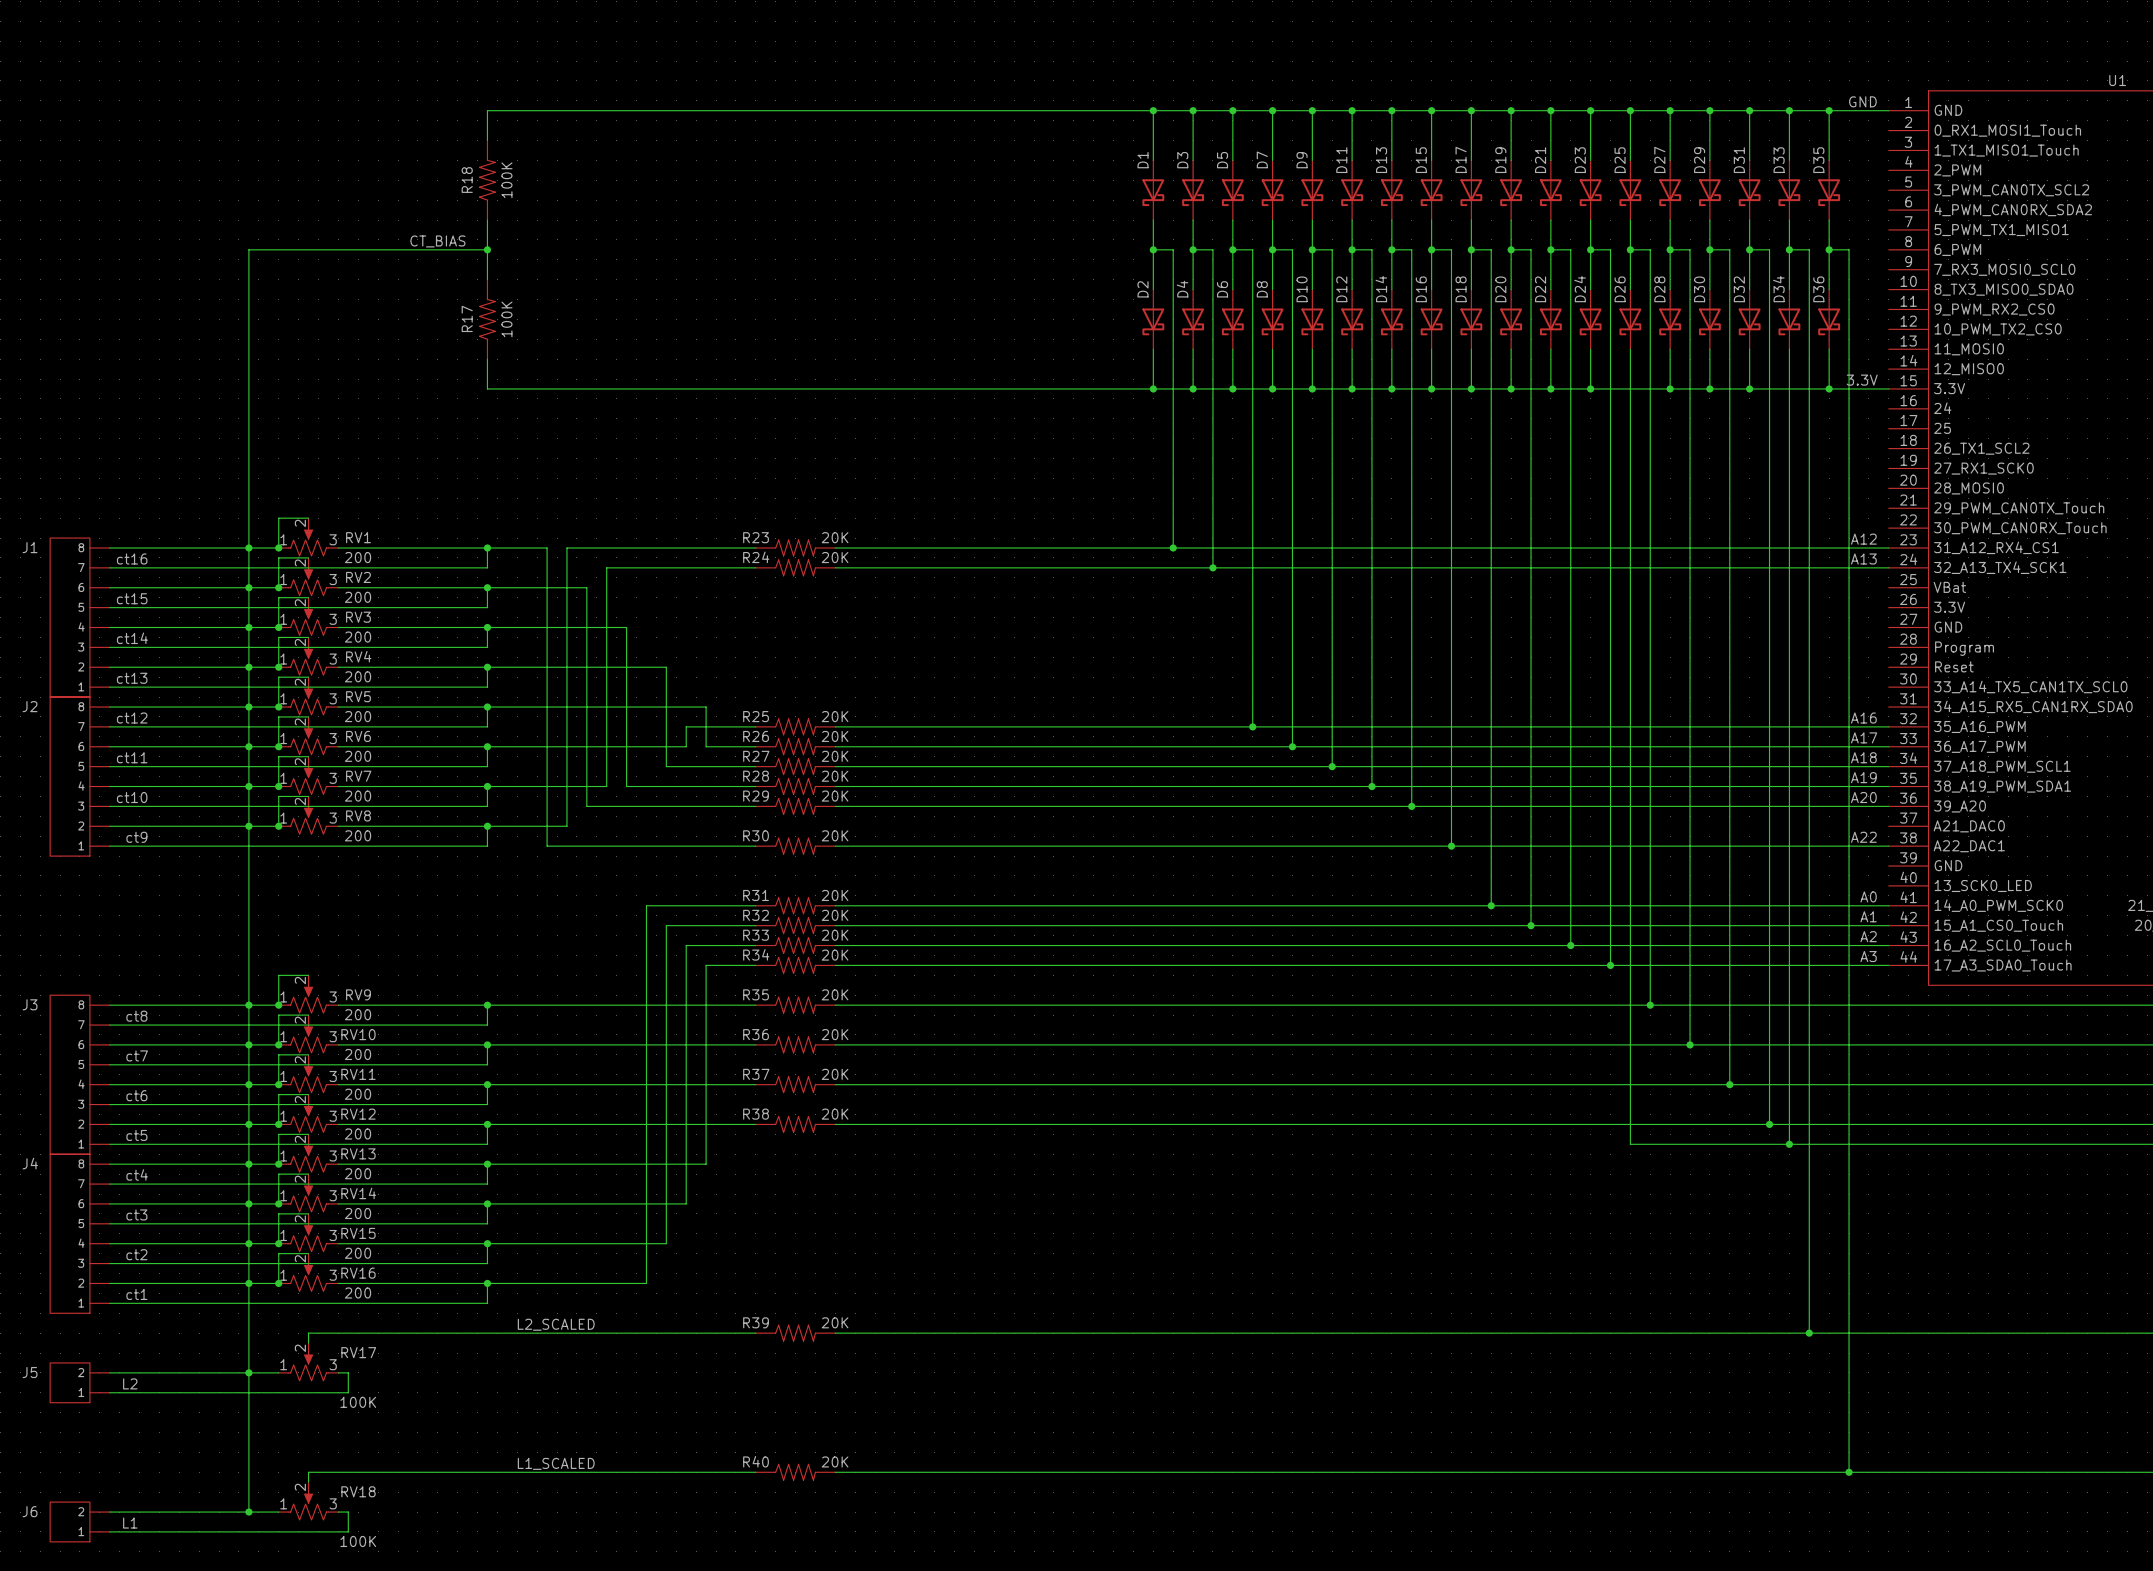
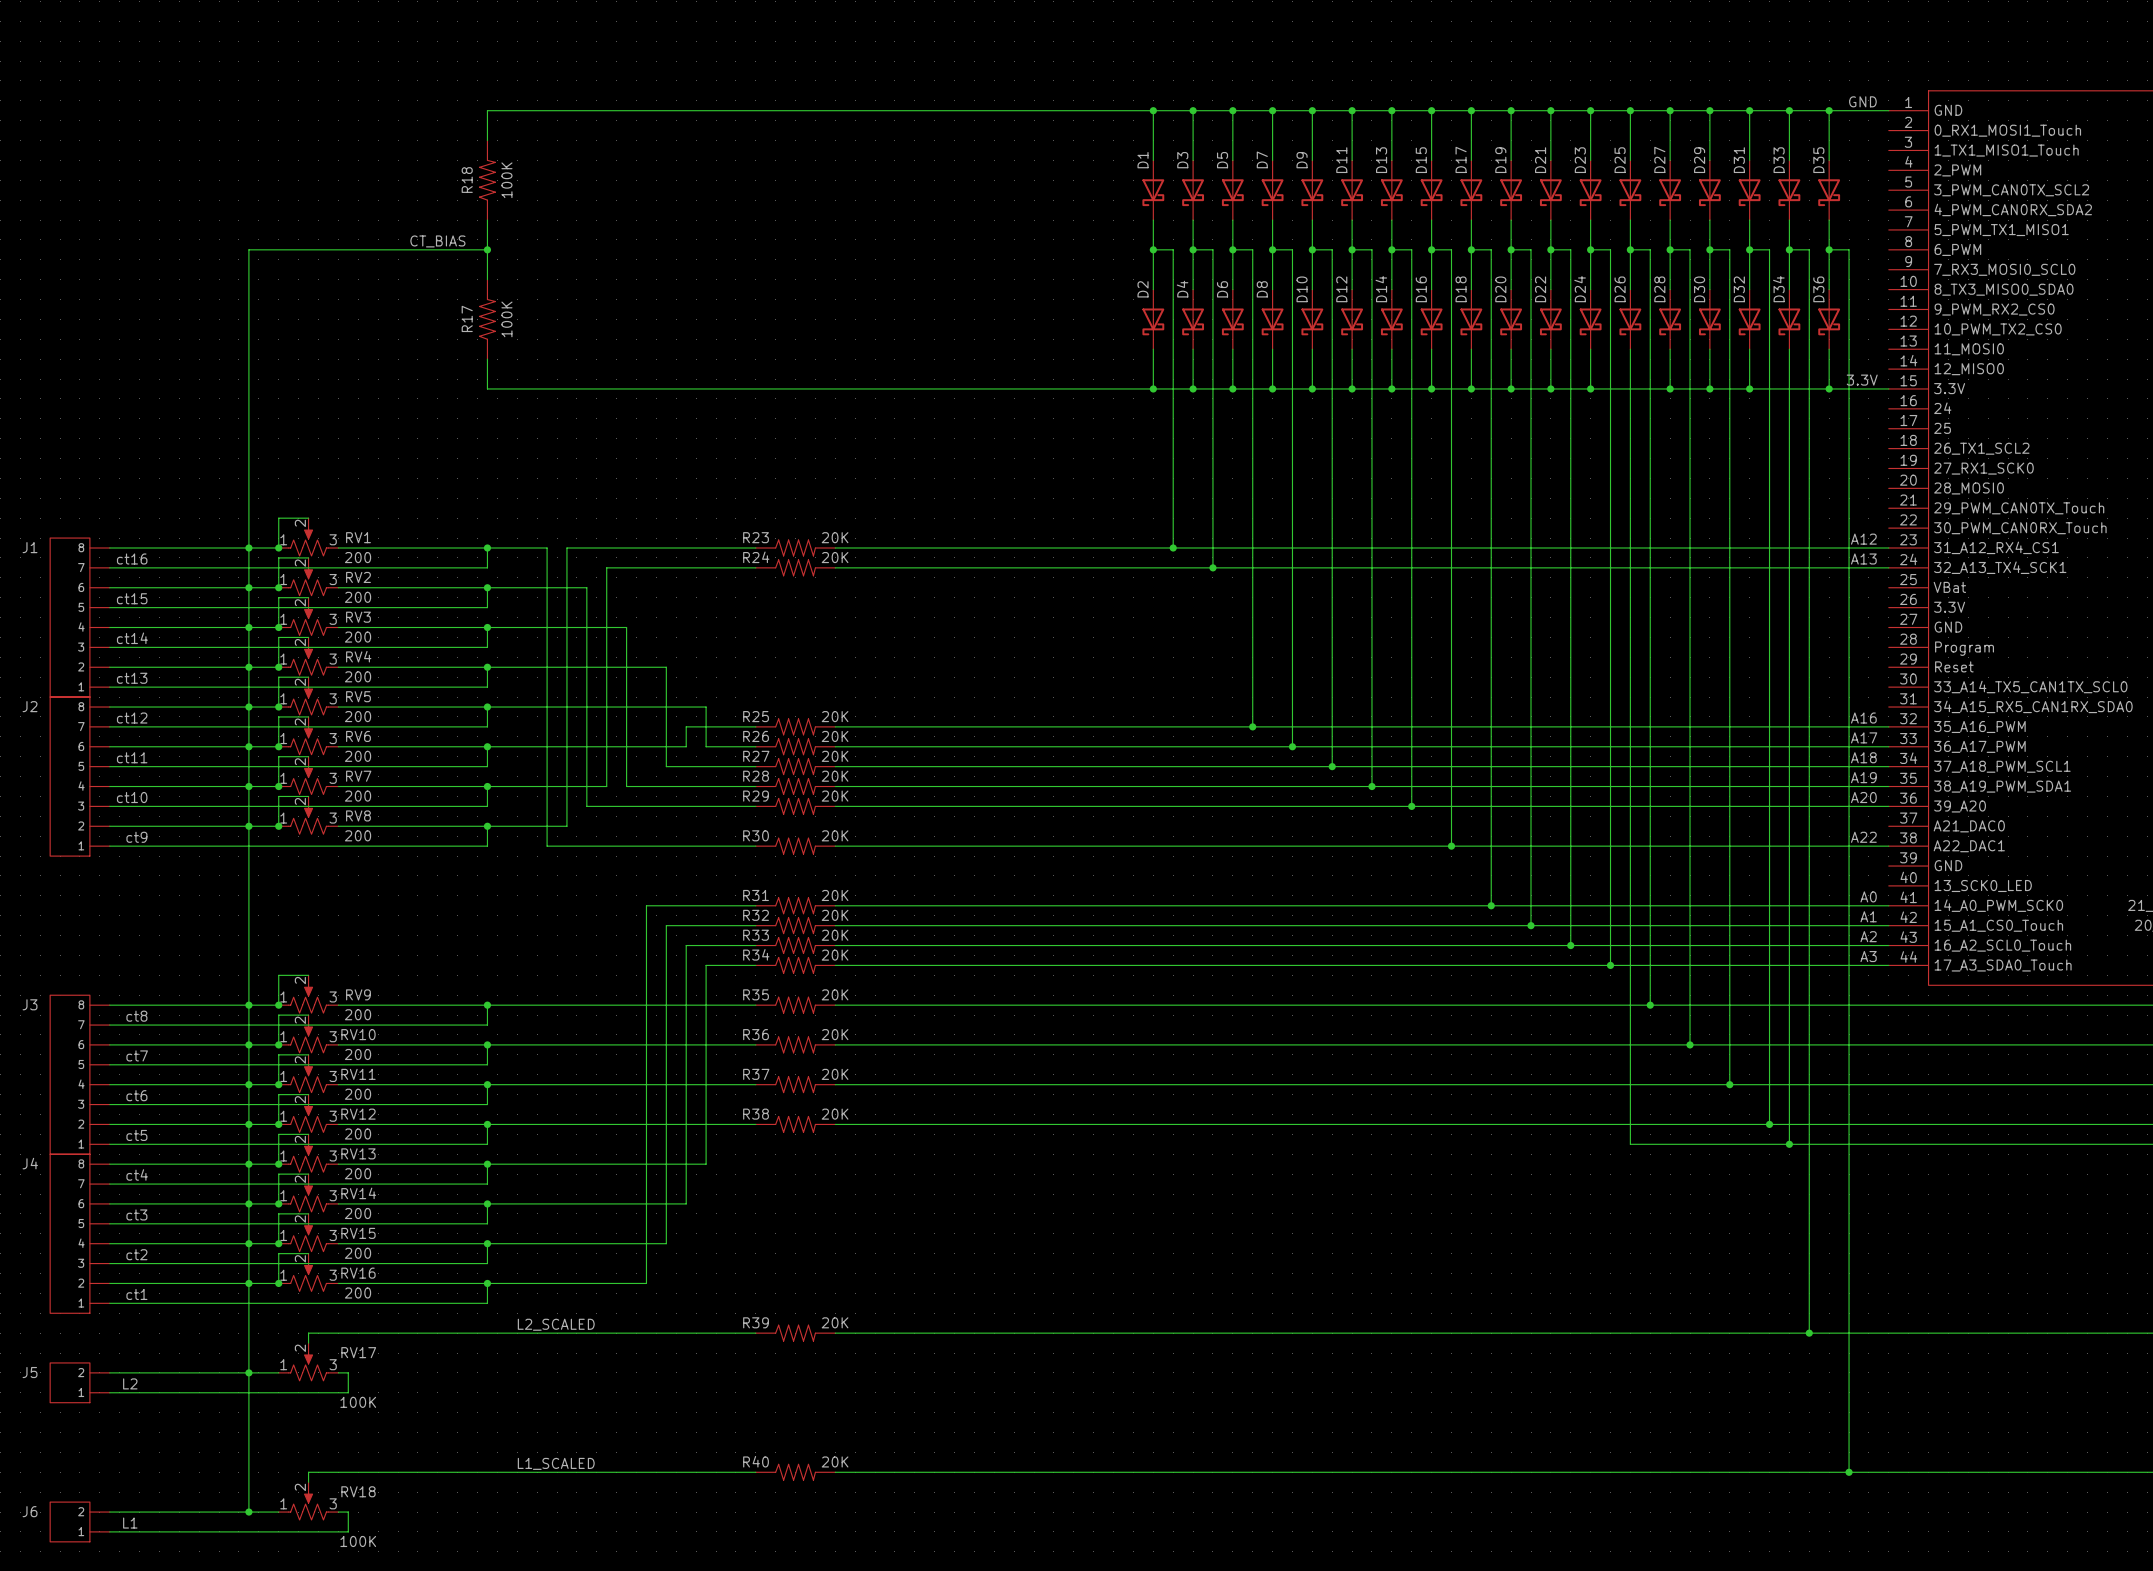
U1 name: U1 (2117, 80) -> none

